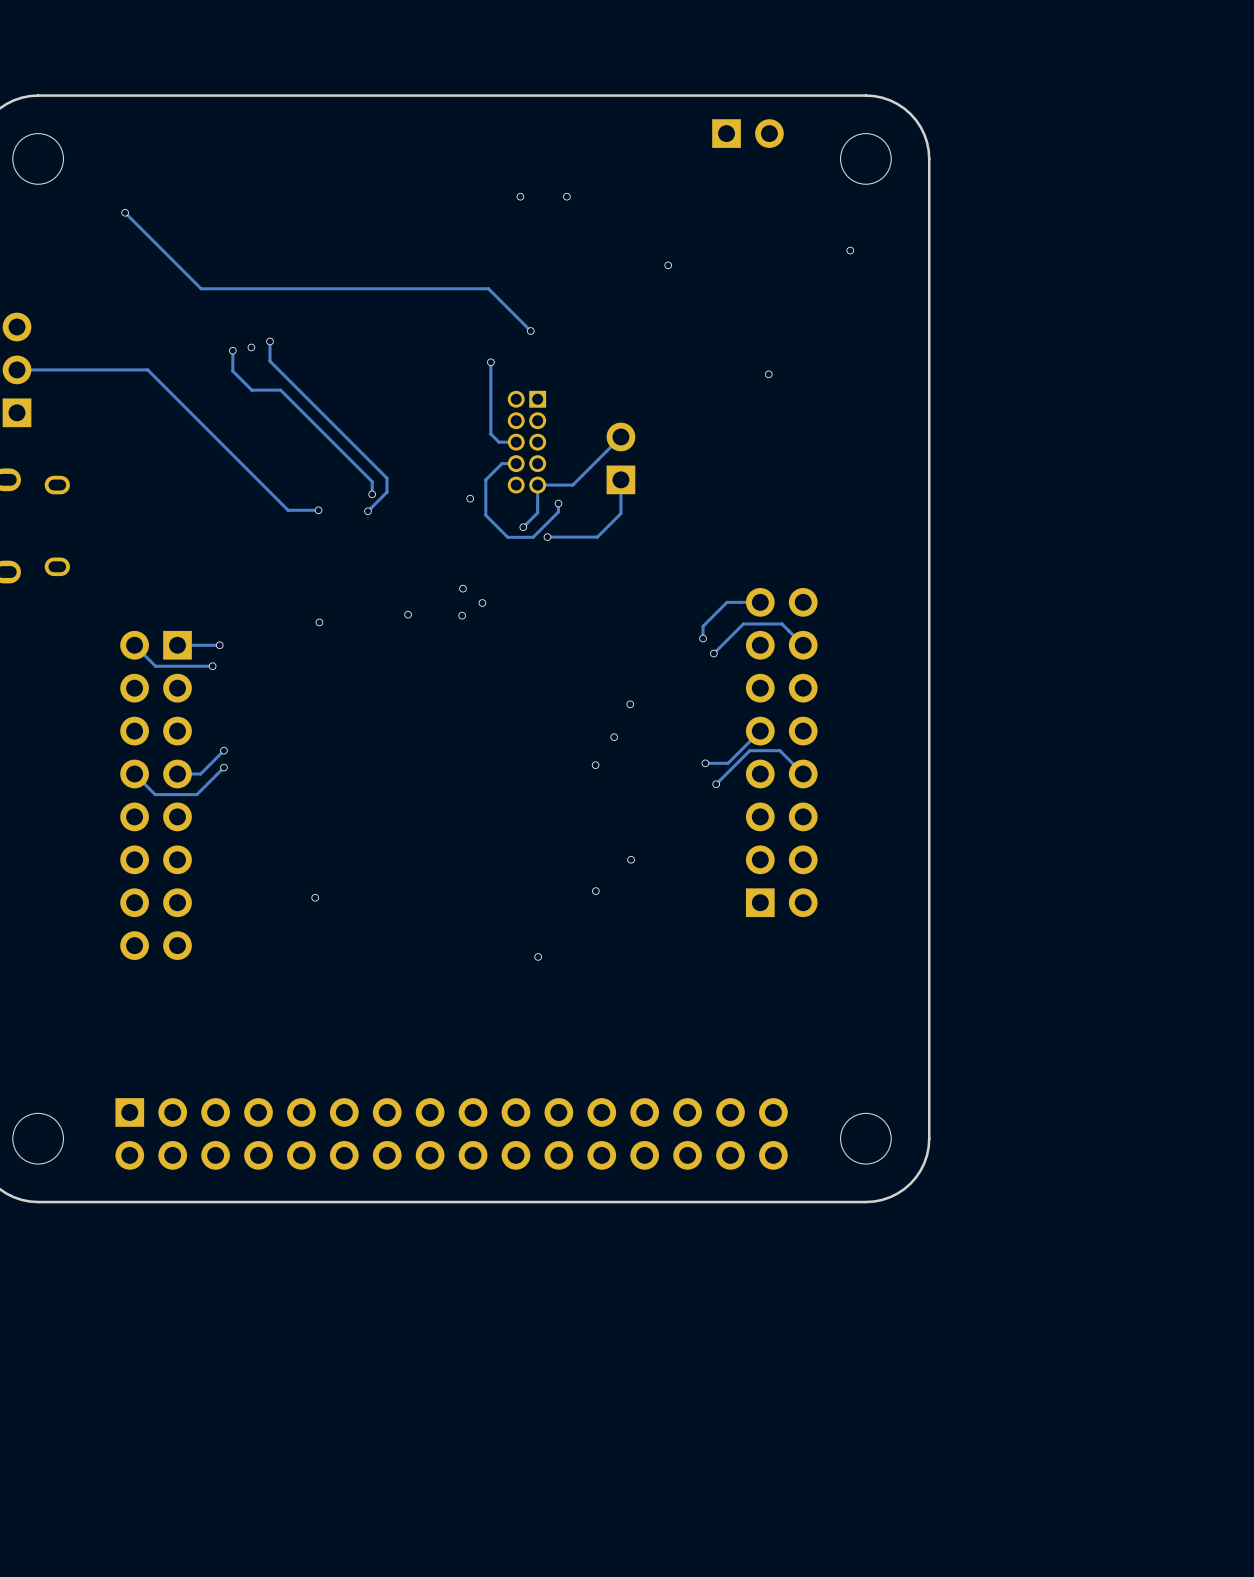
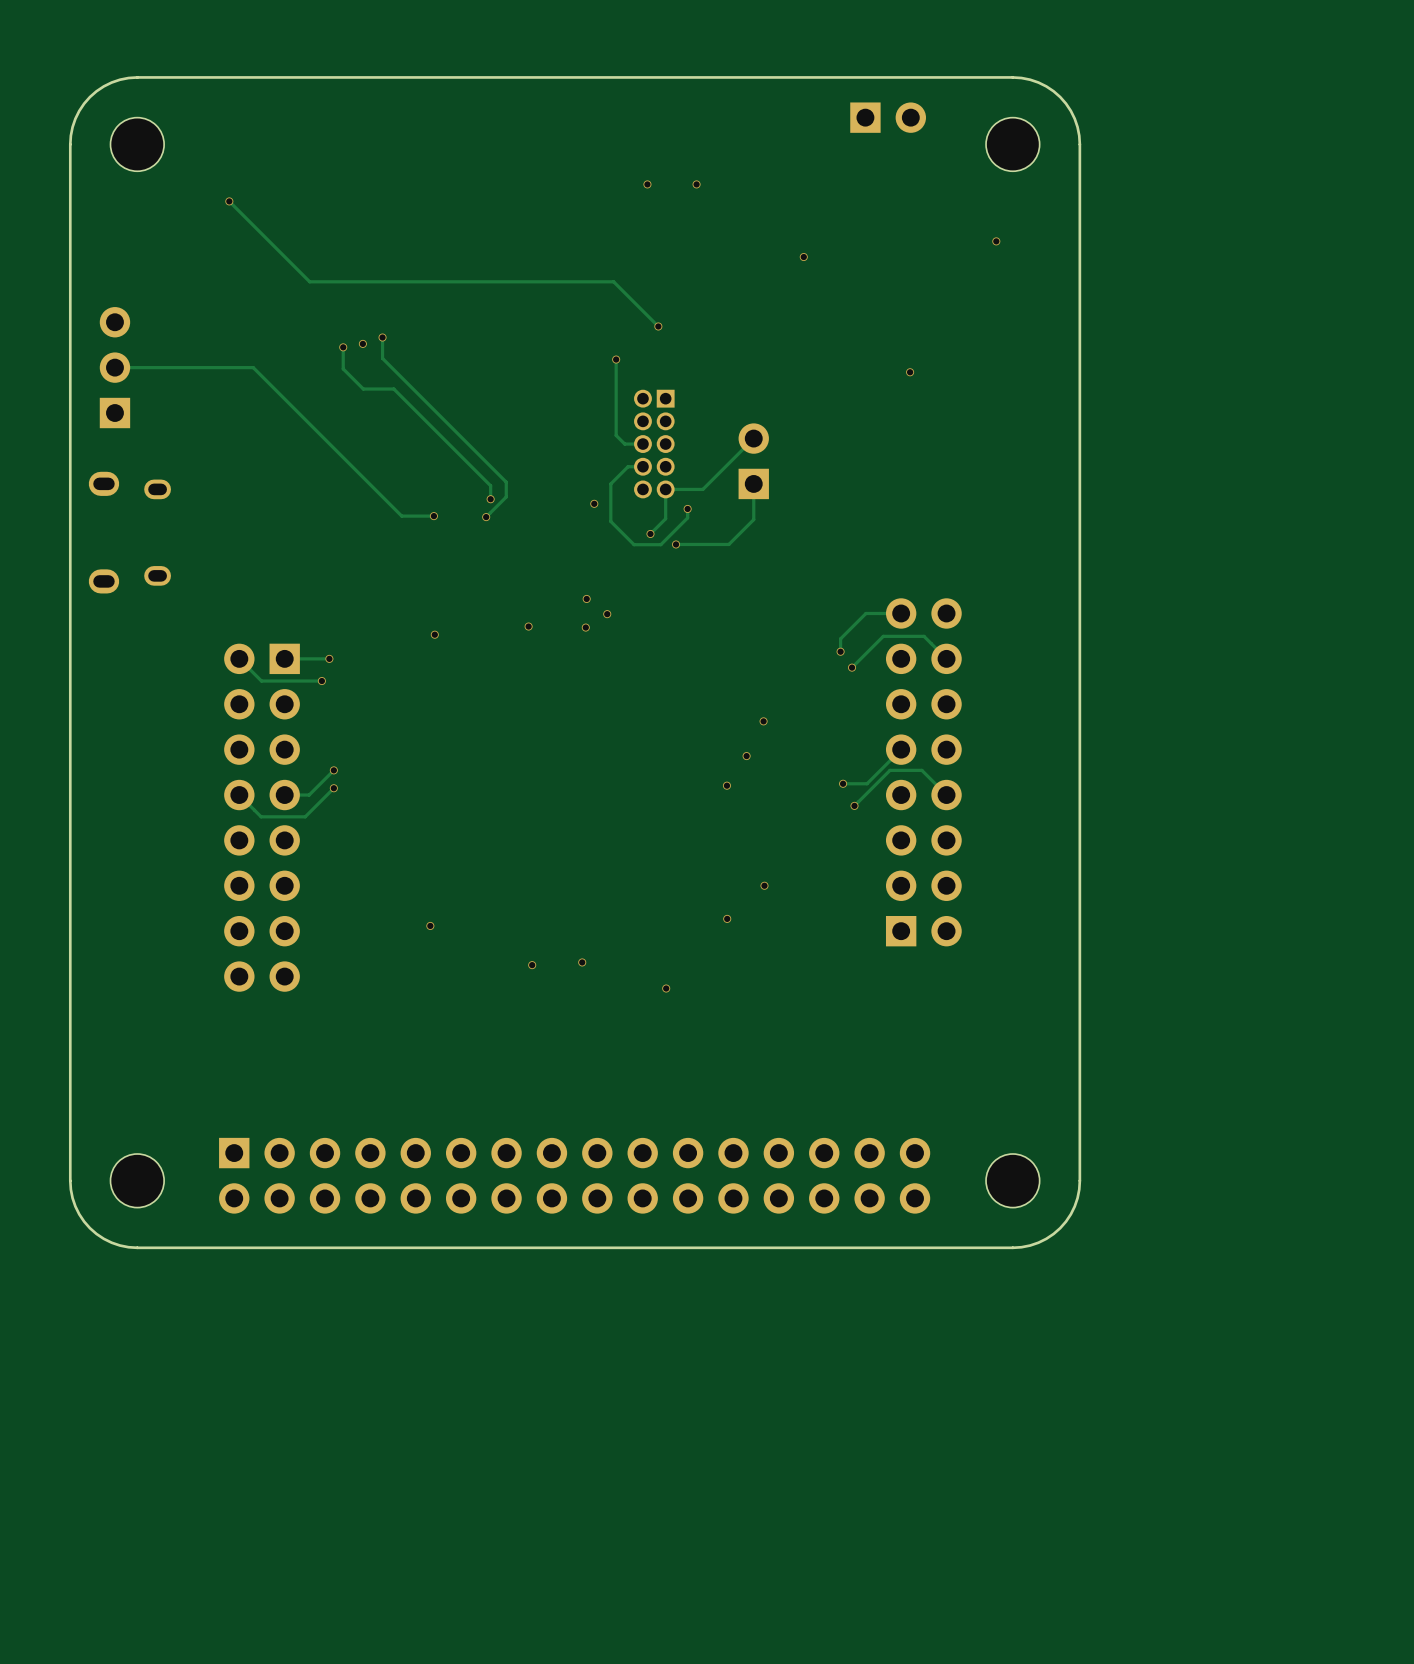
via: none -> (582, 962)
via: none -> (532, 965)

